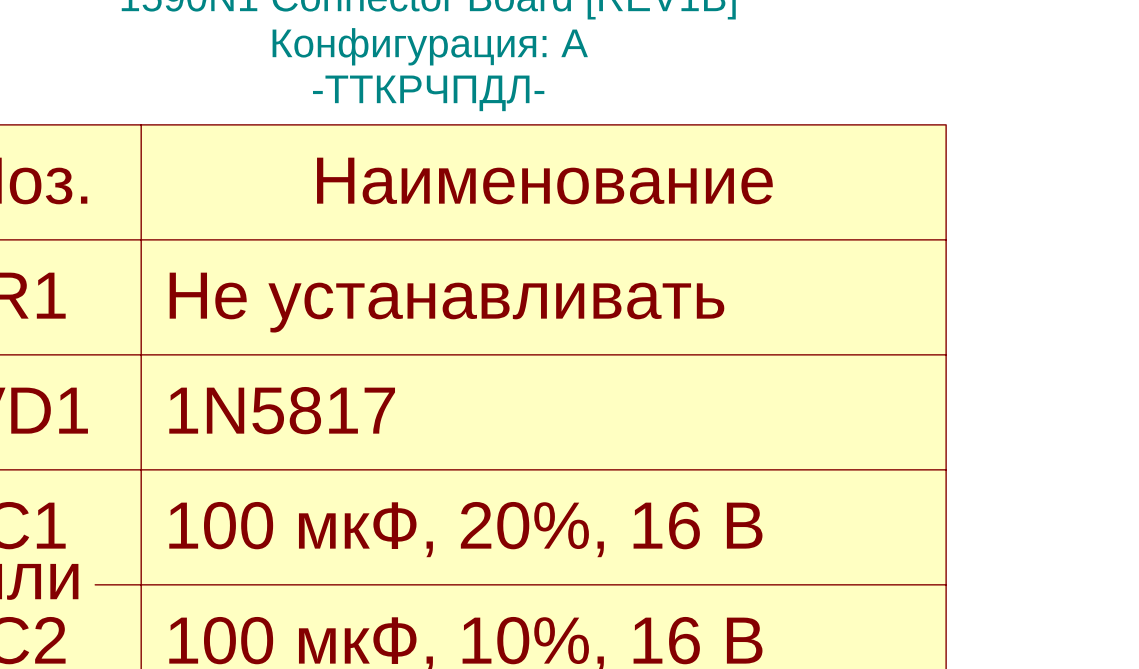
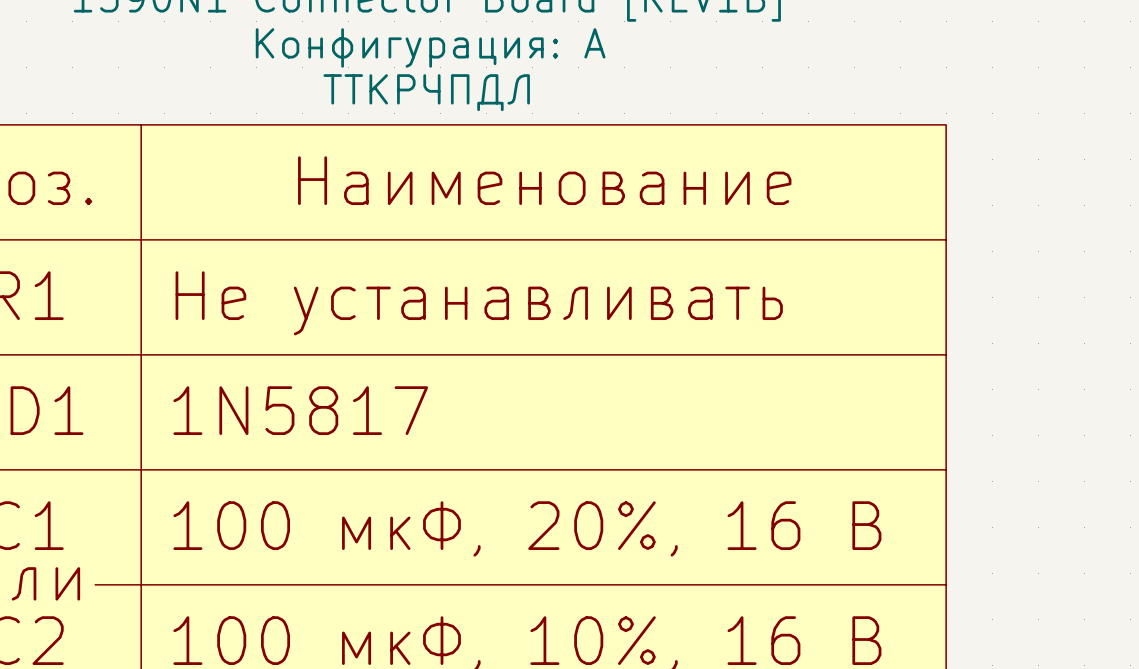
part text: -ТТКРЧПДЛ- (428, 93) -> ТТКРЧПДЛ (426, 92)

